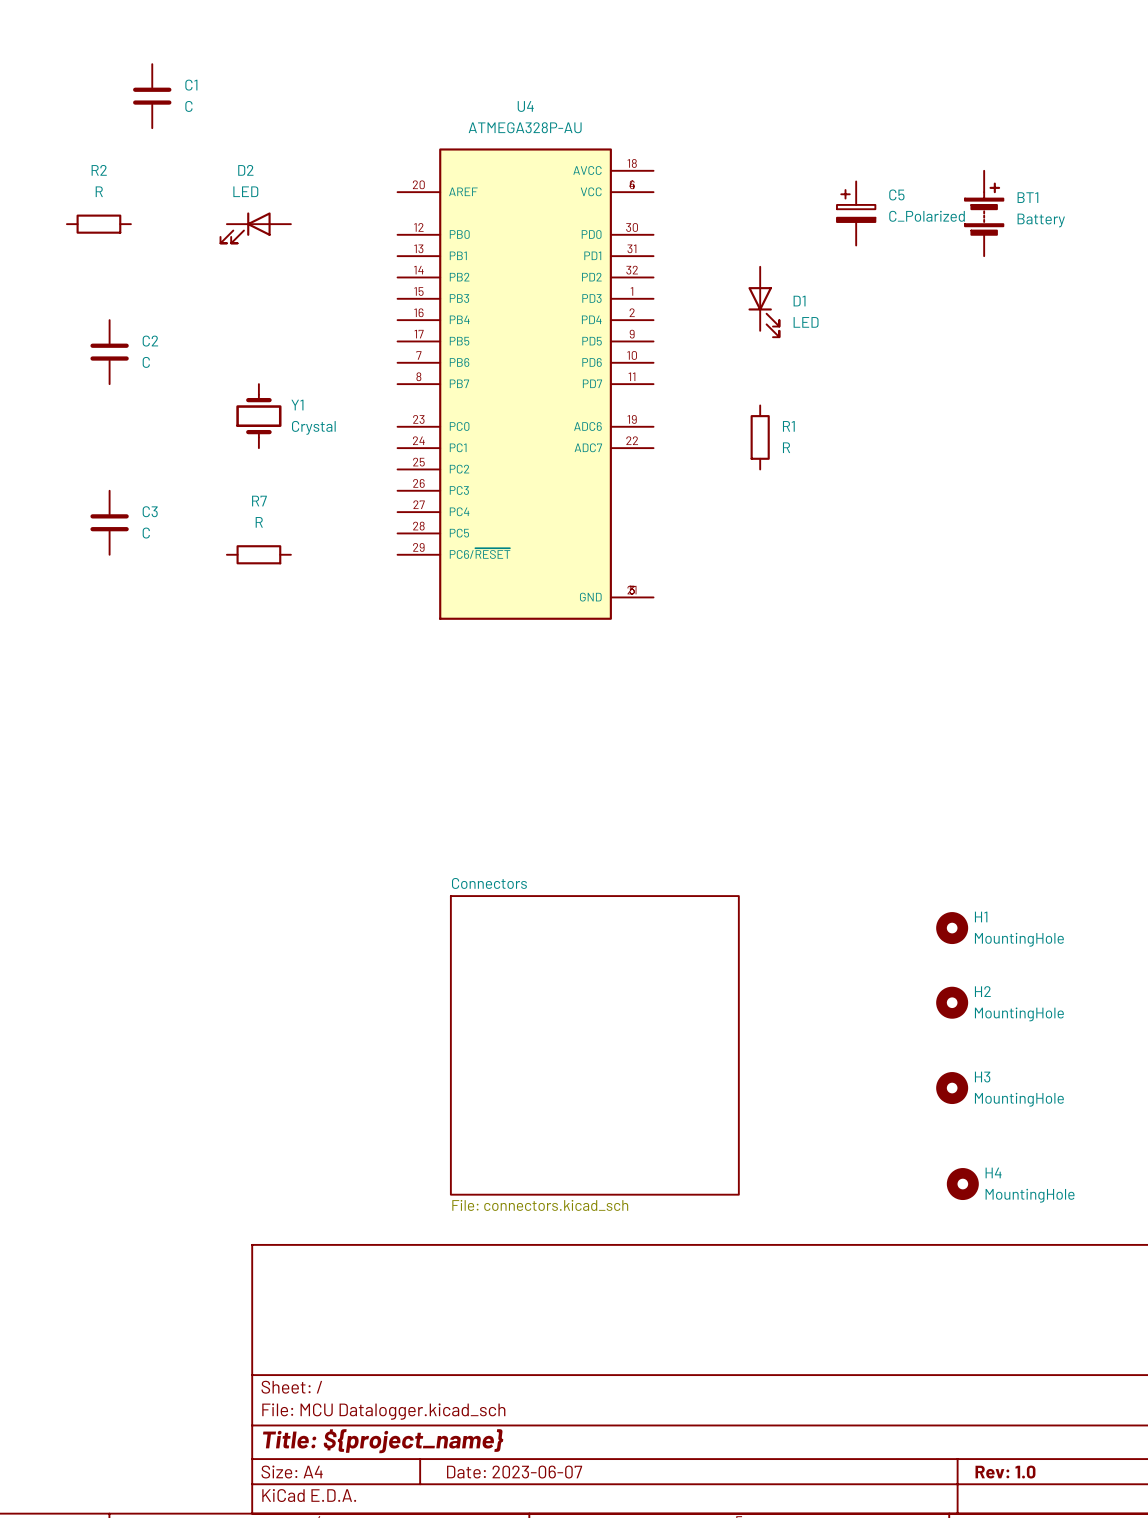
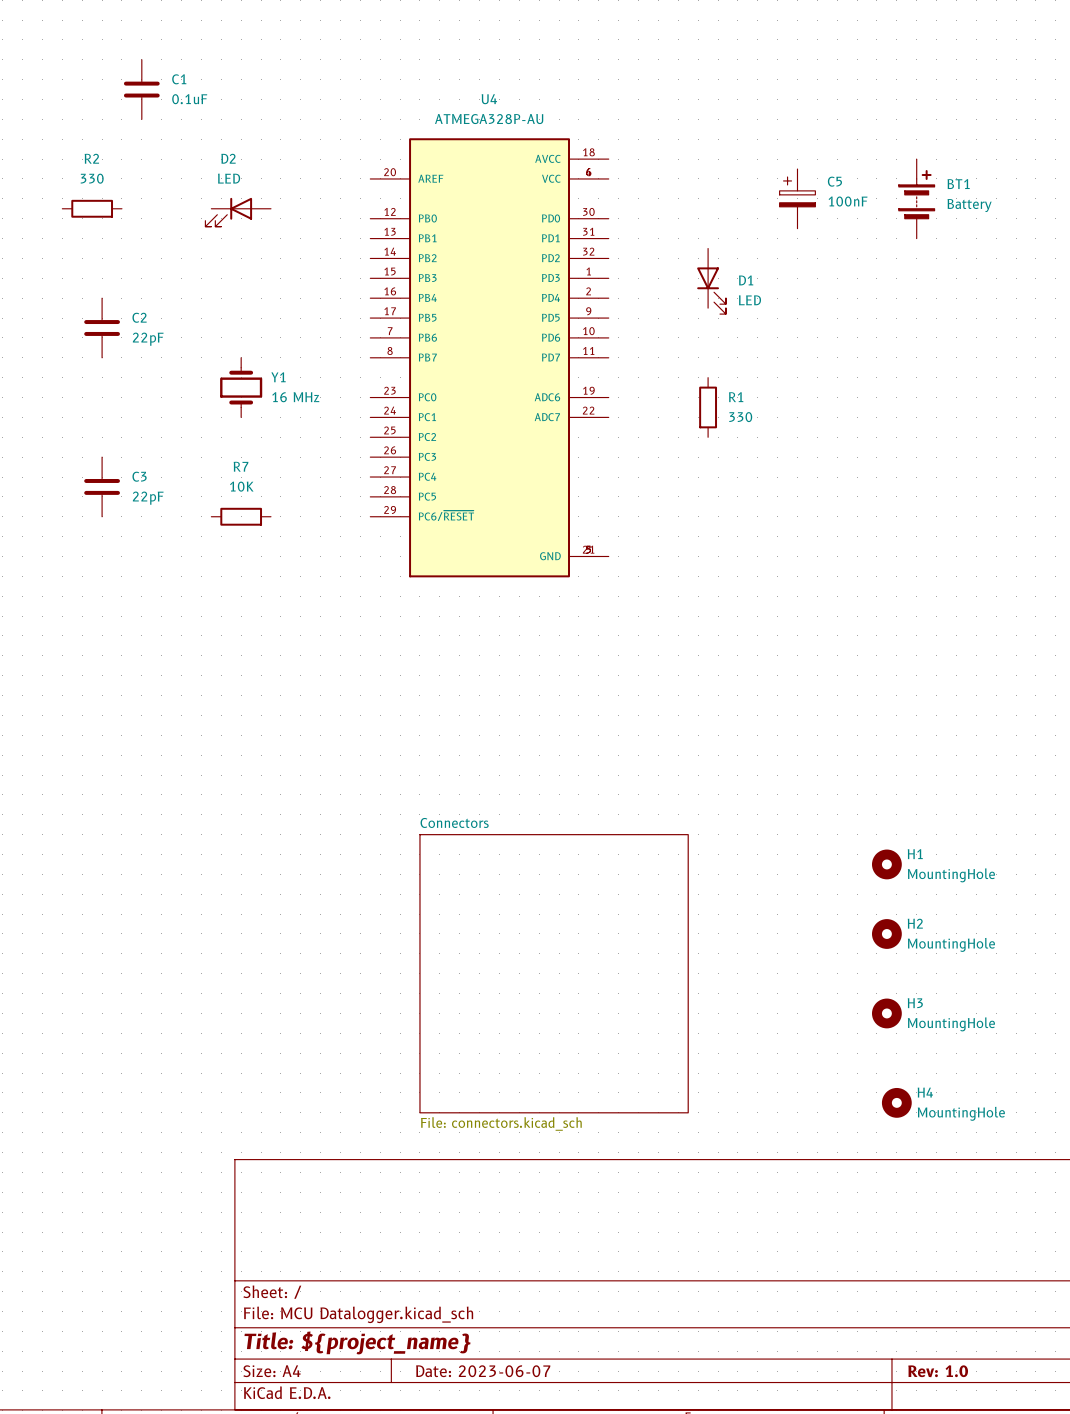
C1 value: C (188, 106) -> 0.1uF (189, 99)
R2 value: R (99, 191) -> 330 (92, 178)
C5 value: C_Polarized (927, 216) -> 100nF (848, 201)
C2 value: C (146, 362) -> 22pF (148, 339)
Y1 value: Crystal (313, 427) -> 16 MHz (295, 397)
R1 value: R (786, 447) -> 330 (740, 417)
R7 value: R (259, 522) -> 10K (241, 486)
C3 value: C (146, 533) -> 22pF (148, 498)

